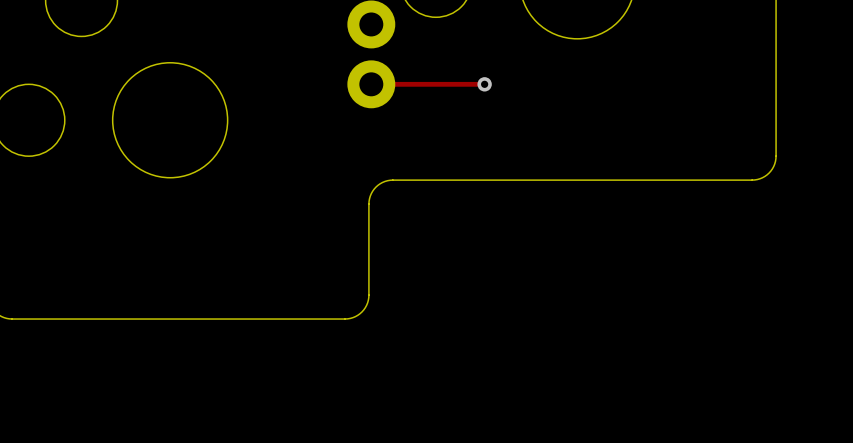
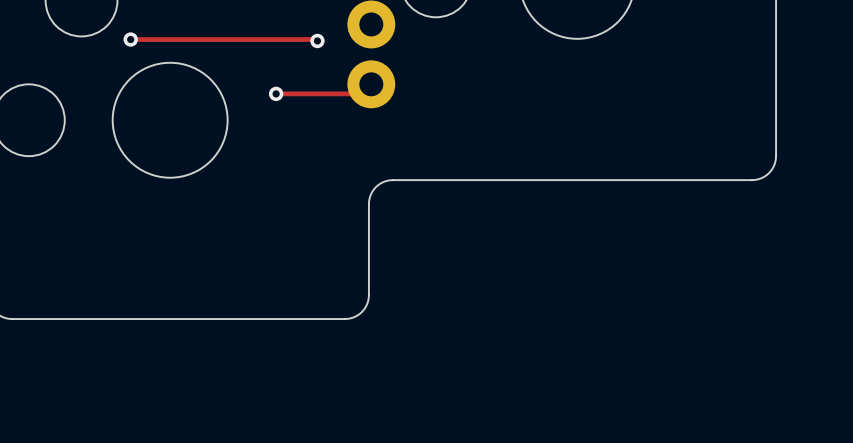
track: none -> (130, 39) (317, 40)
via: none -> (130, 39)
via: none -> (317, 40)
track: (371, 84) (484, 84) -> (371, 84) (361, 93) (276, 93)
via: (484, 84) -> none
via: none -> (276, 93)

